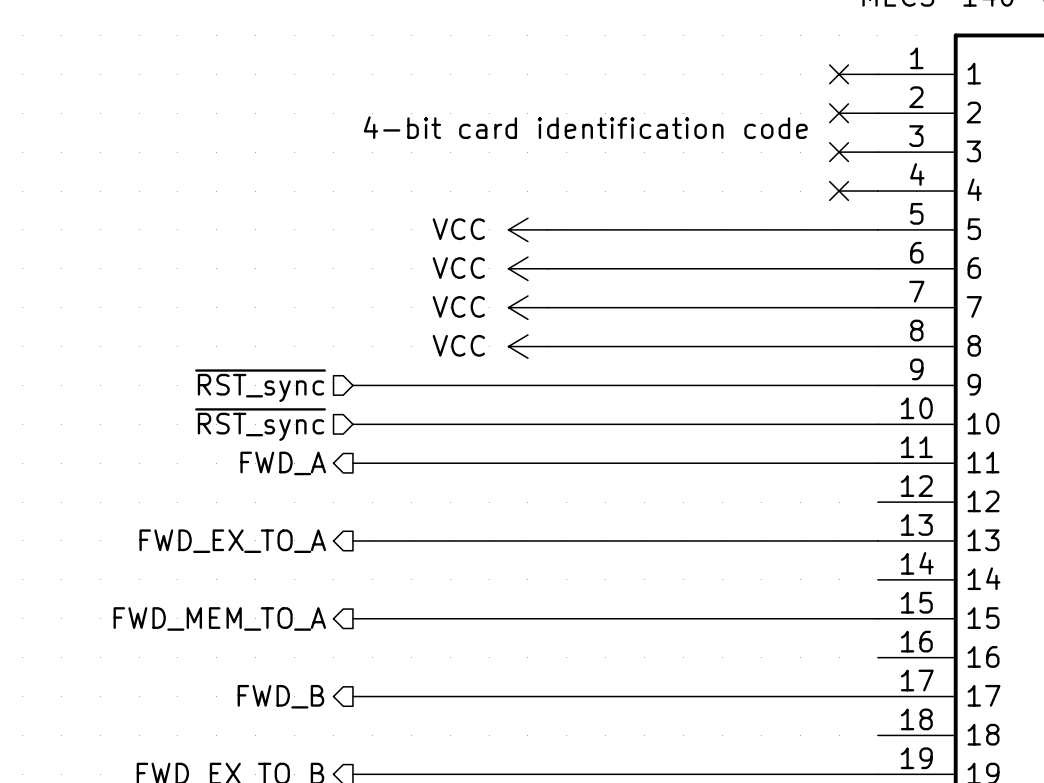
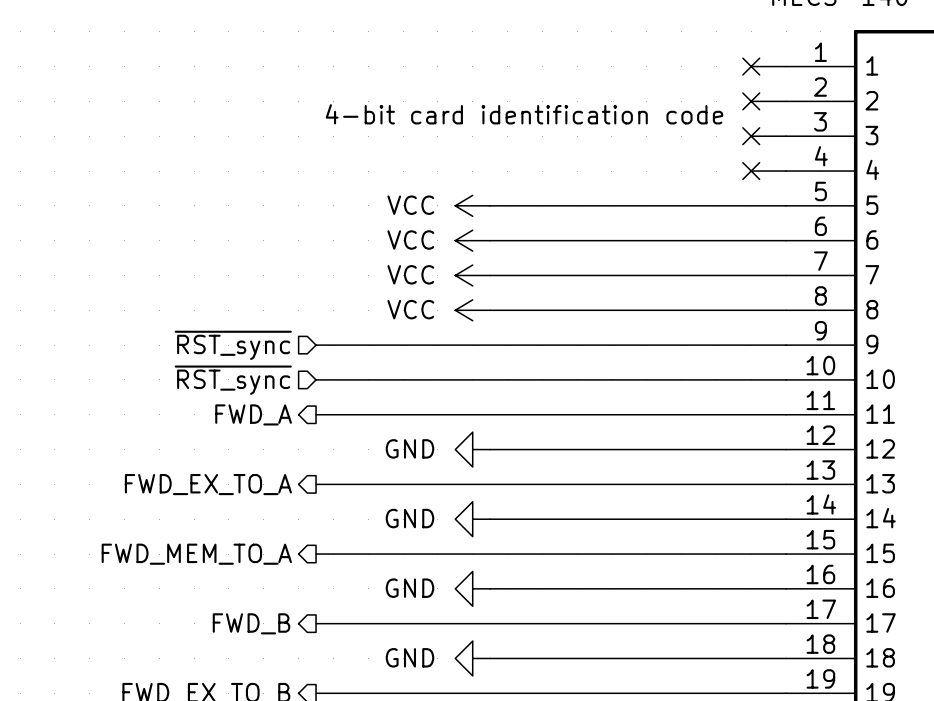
power symbol: none -> GND (472, 449)
wire: none -> (490, 449) (786, 449)
power symbol: none -> GND (472, 519)
wire: none -> (490, 519) (786, 519)
power symbol: none -> GND (472, 588)
wire: none -> (490, 588) (786, 588)
power symbol: none -> GND (472, 658)
wire: none -> (490, 658) (786, 658)

